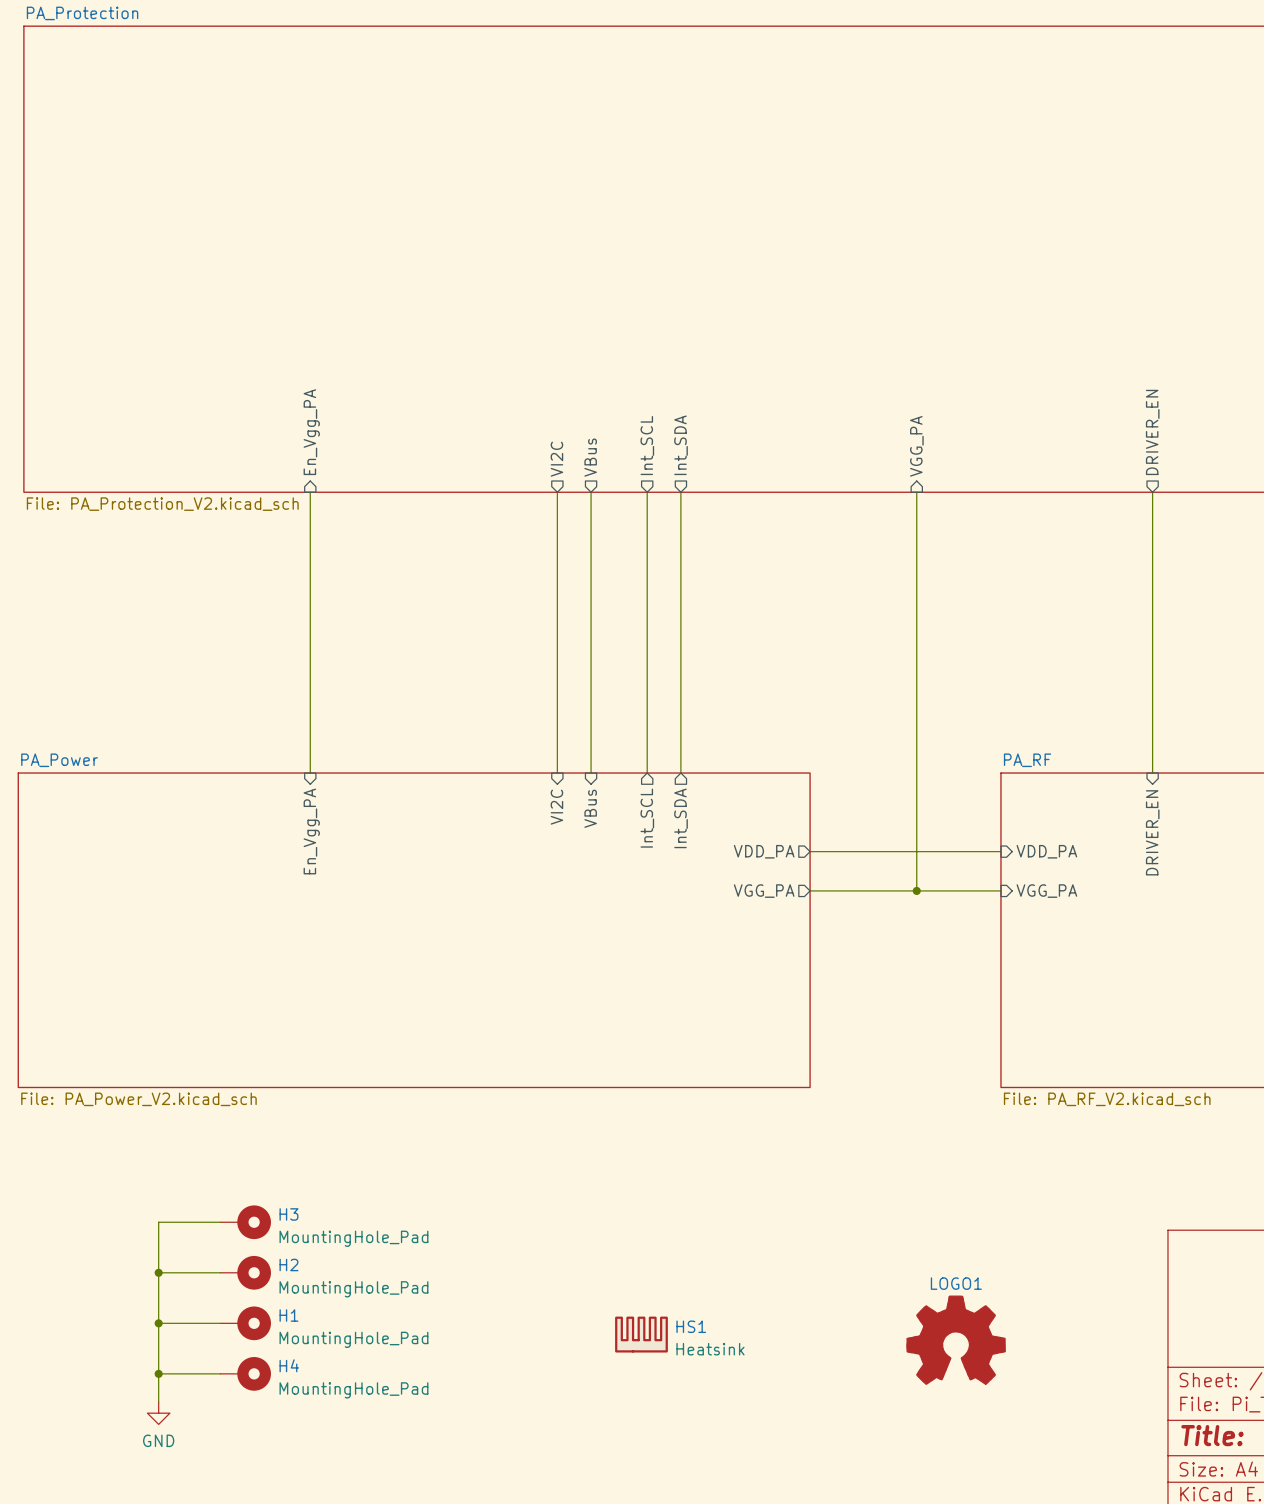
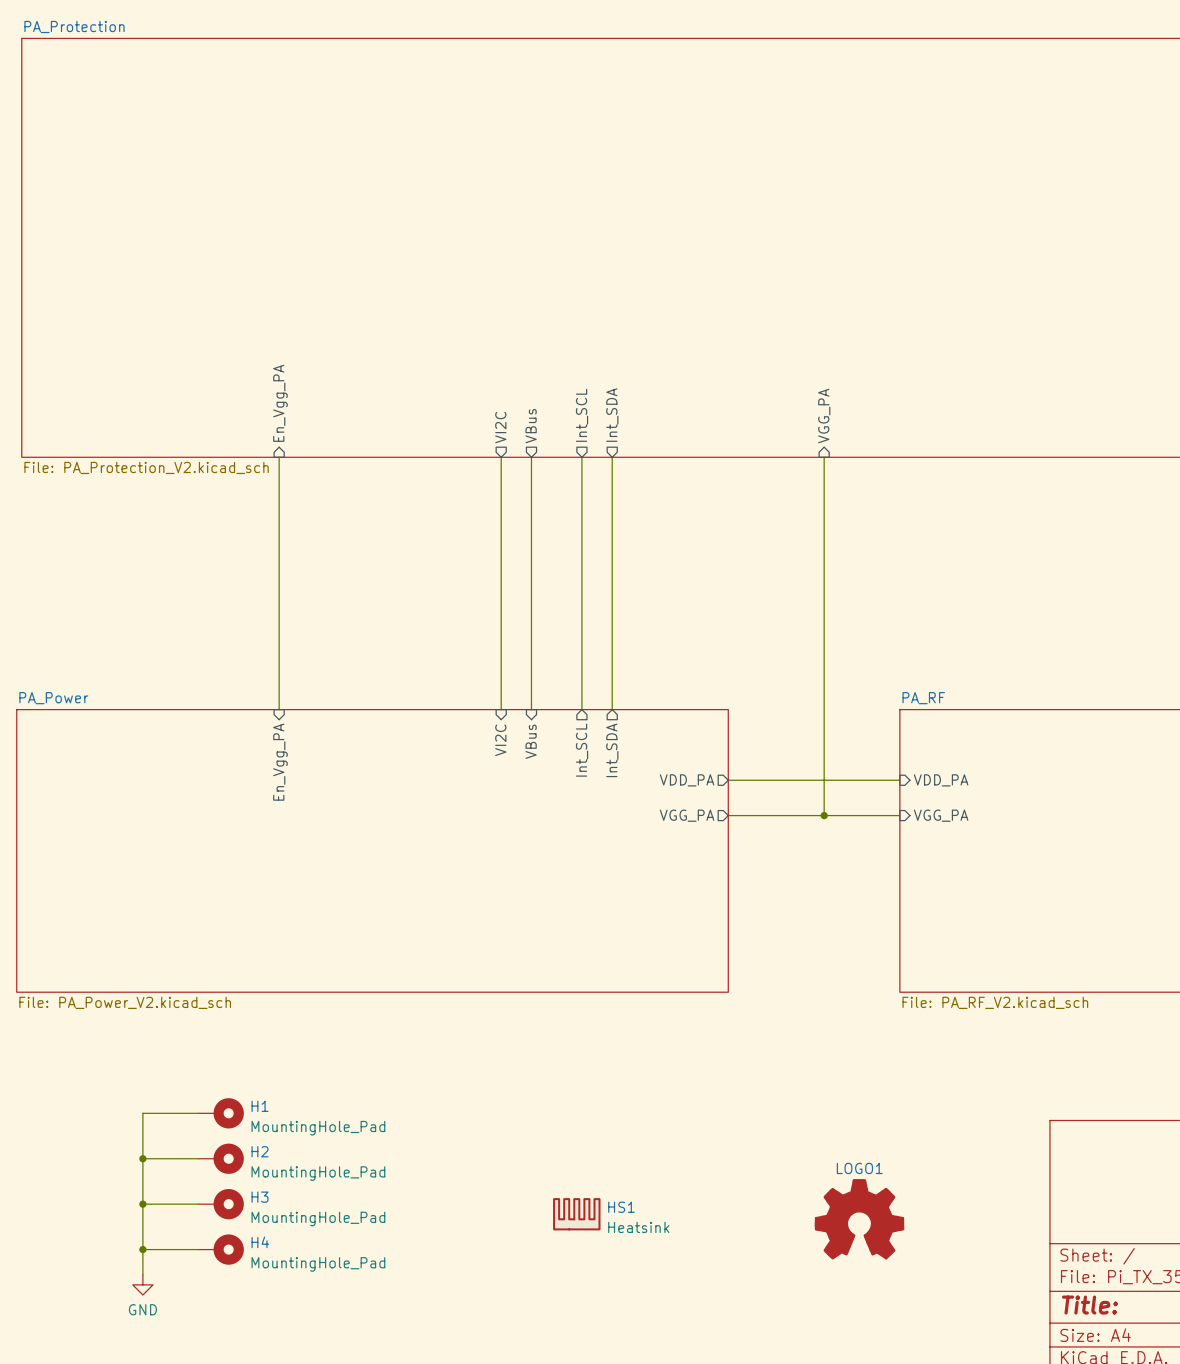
sheet pin: DRIVER_EN (1152, 432) -> none
wire: (1152, 492) (1152, 773) -> none
sheet pin: DRIVER_EN (1152, 832) -> none
H3 name: H3 (288, 1214) -> H1 (260, 1106)
H1 name: H1 (288, 1315) -> H3 (260, 1197)

